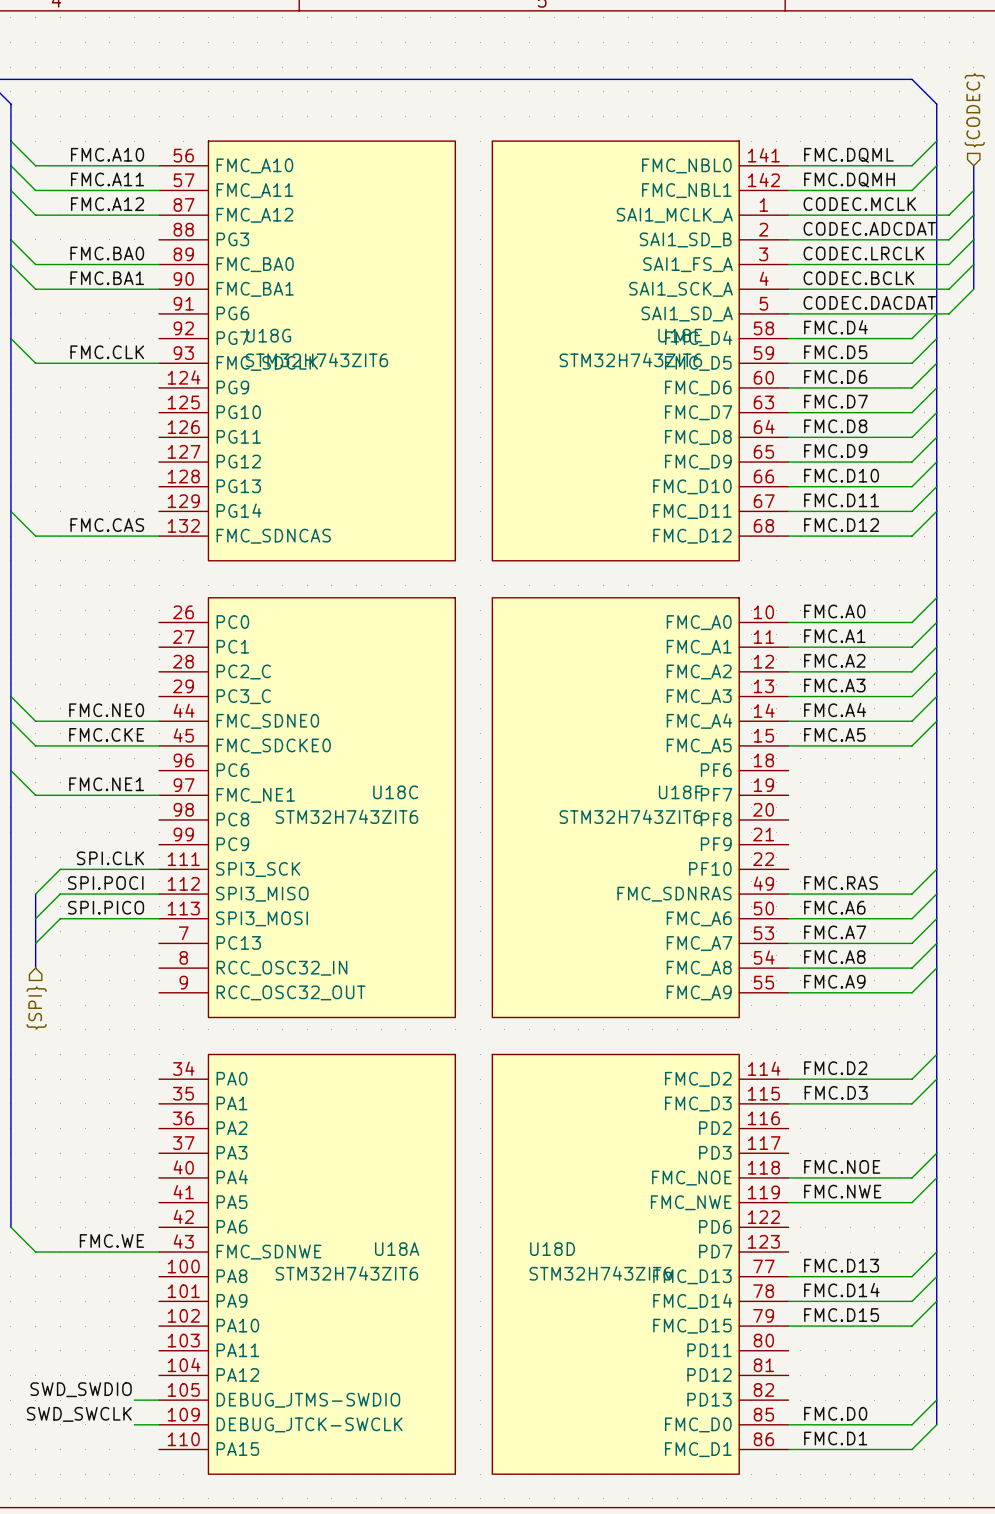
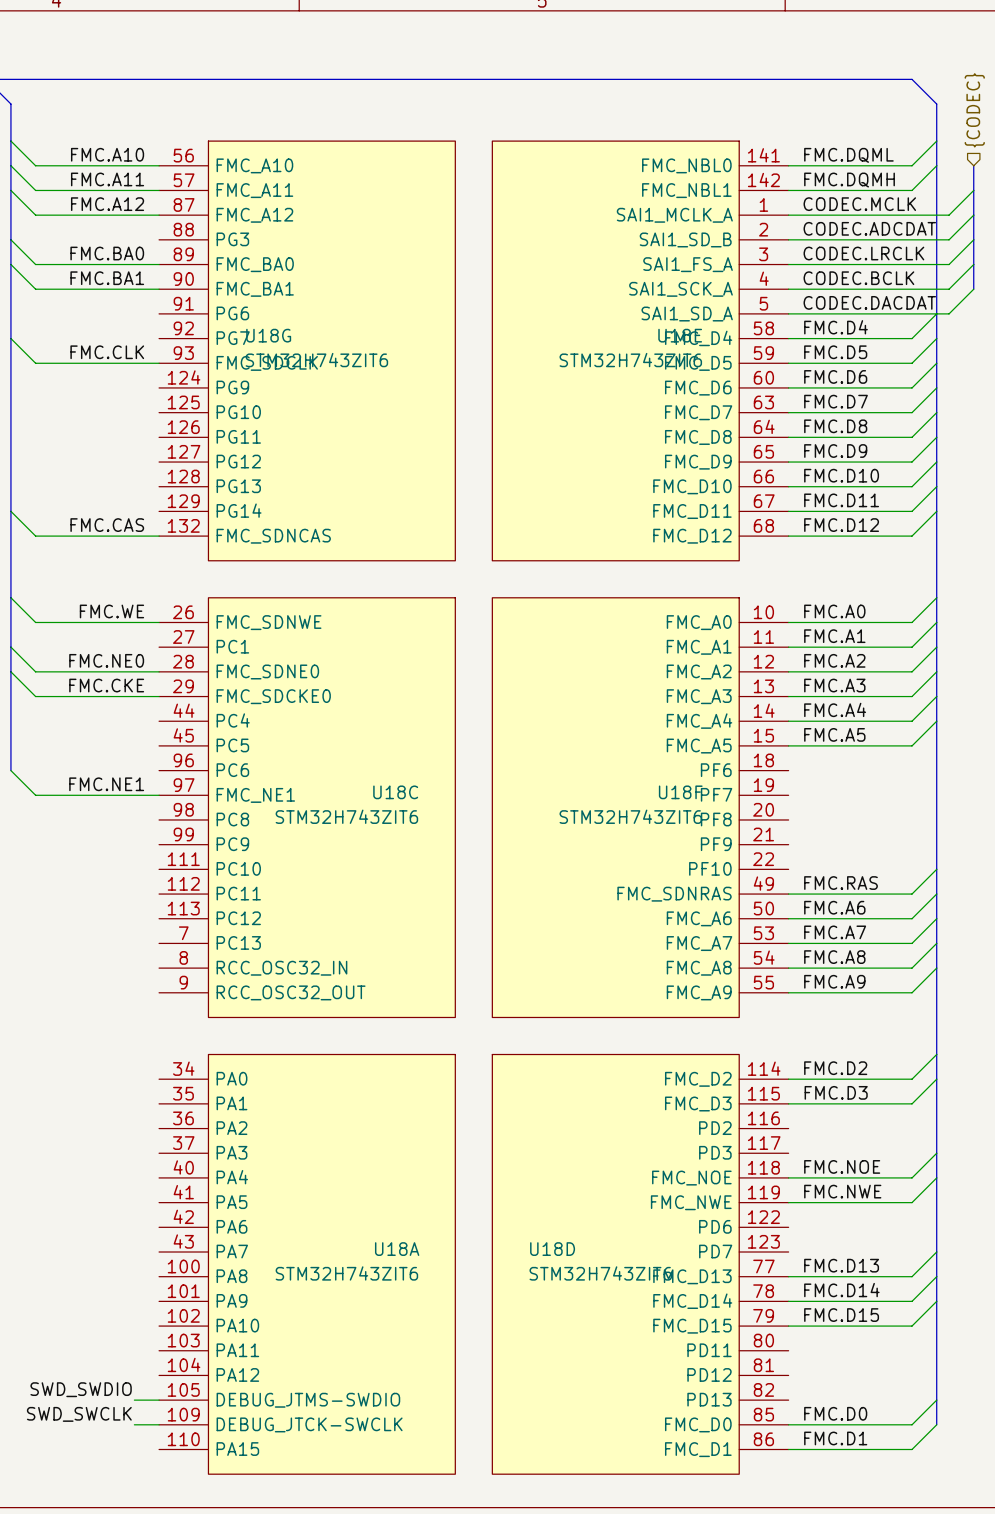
wire: none -> (10, 597) (35, 622) (159, 622)
label: none -> FMC.WE (111, 611)
U18C pin name: PC0 (232, 622) -> FMC_SDNWE (269, 622)
U18C pin name: PC2_C (243, 671) -> FMC_SDNE0 (267, 671)
wire: (10, 696) (35, 721) (159, 721) -> (10, 647) (35, 671) (159, 671)
U18C pin name: PC3_C (243, 696) -> FMC_SDCKE0 (273, 696)
label position: FMC.NE0 (106, 710) -> FMC.NE0 (106, 660)
wire: (10, 721) (35, 745) (159, 745) -> (10, 671) (35, 696) (159, 696)
U18C pin name: FMC_SDNE0 (267, 721) -> PC4 (233, 720)
label position: FMC.CKE (106, 734) -> FMC.CKE (106, 685)
U18C pin name: FMC_SDCKE0 (273, 746) -> PC5 (232, 745)
bus: (10, 770) (10, 1227) -> none
label: SPI.CLK (110, 858) -> none
wire: (159, 869) (60, 869) (35, 894) -> none
U18C pin name: SPI3_SCK (258, 869) -> PC10 (238, 868)
label: SPI.POCI (105, 883) -> none
bus: (35, 894) (35, 968) -> none
wire: (159, 894) (60, 894) (35, 918) -> none
U18C pin name: SPI3_MISO (262, 894) -> PC11 (238, 893)
label: SPI.PICO (106, 907) -> none
wire: (159, 918) (60, 918) (35, 943) -> none
U18C pin name: SPI3_MOSI (261, 918) -> PC12 (238, 918)
hierarchical label: {SPI} (36, 1007) -> none
wire: (10, 1227) (35, 1252) (159, 1252) -> none
label: FMC.WE (111, 1240) -> none
U18A pin name: FMC_SDNWE (269, 1252) -> PA7 (232, 1251)

